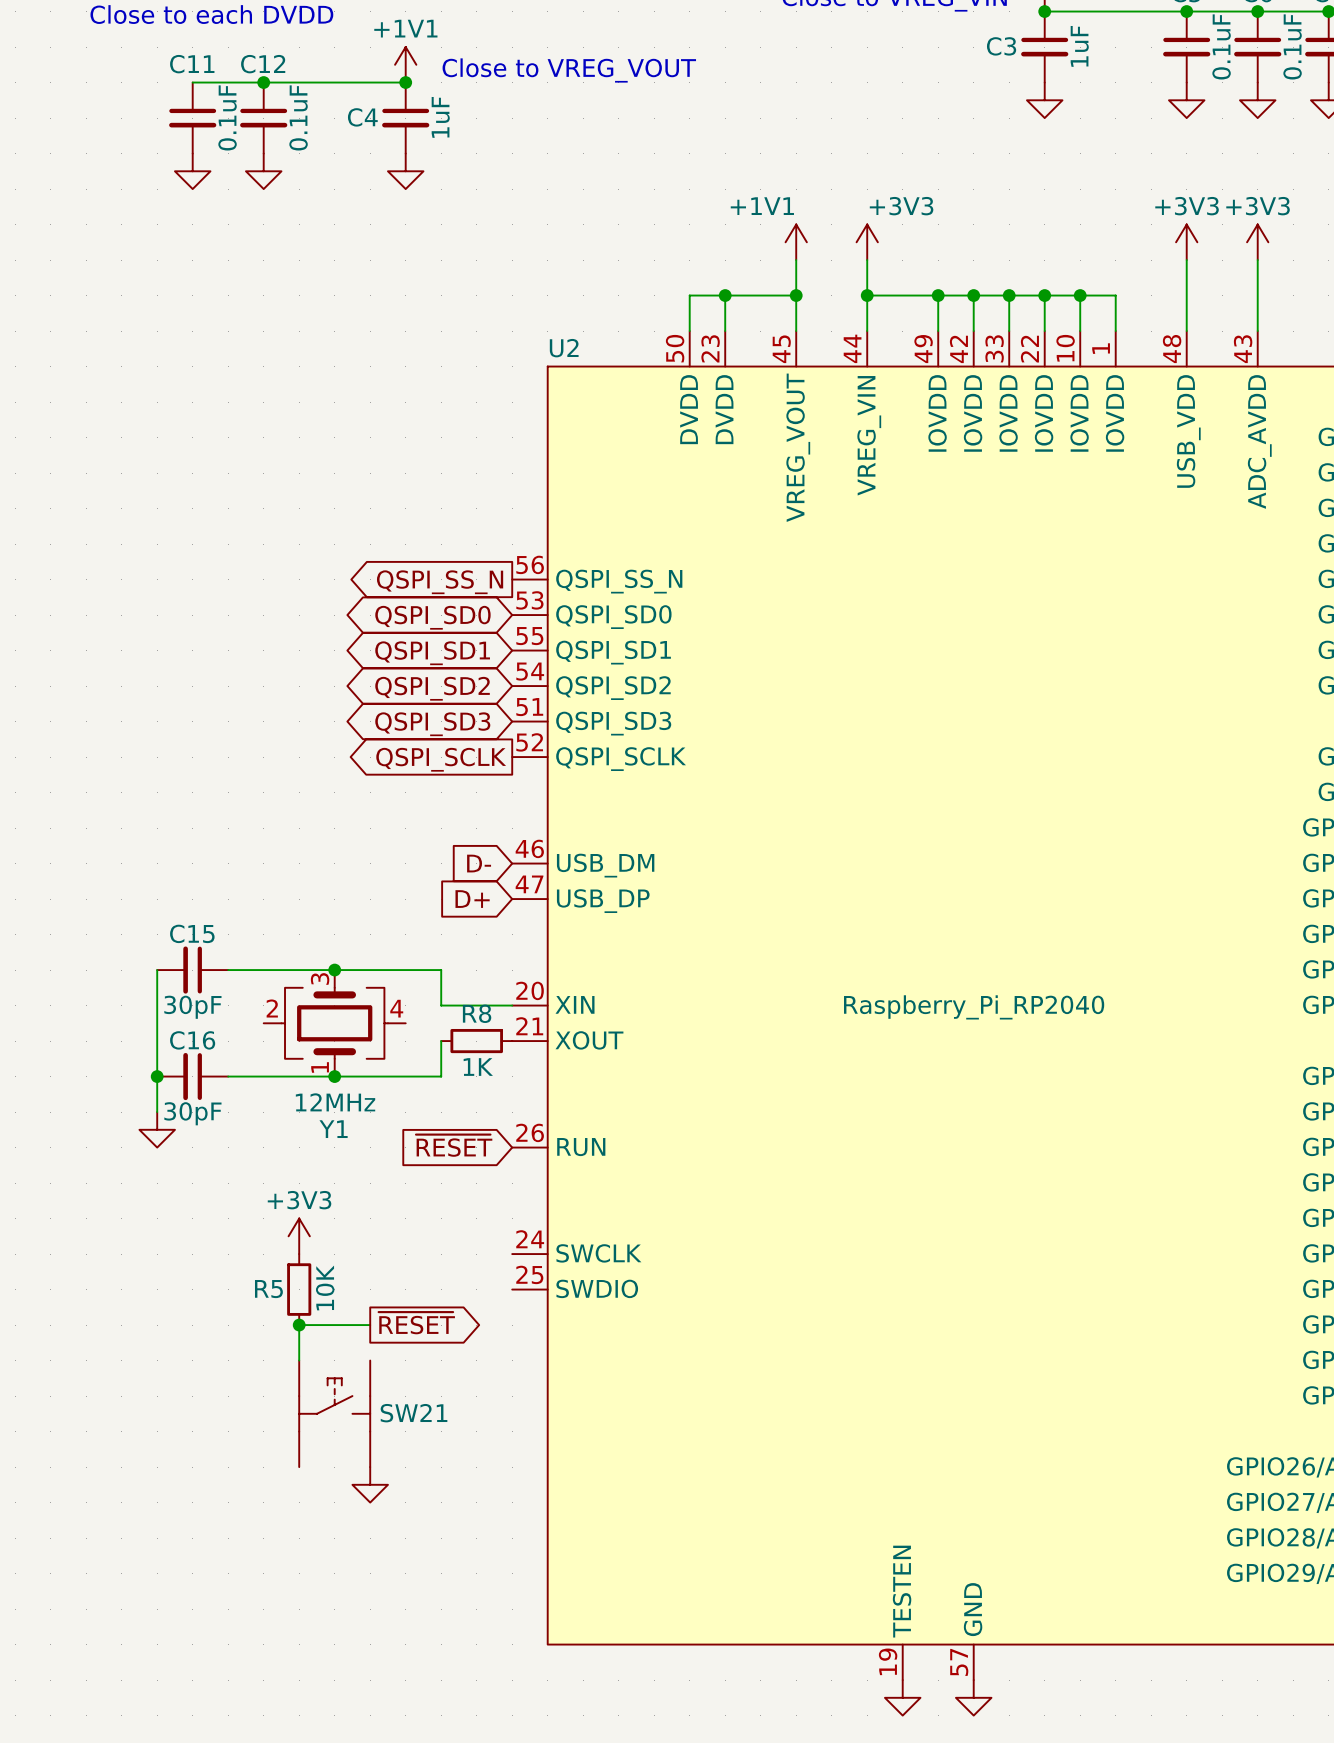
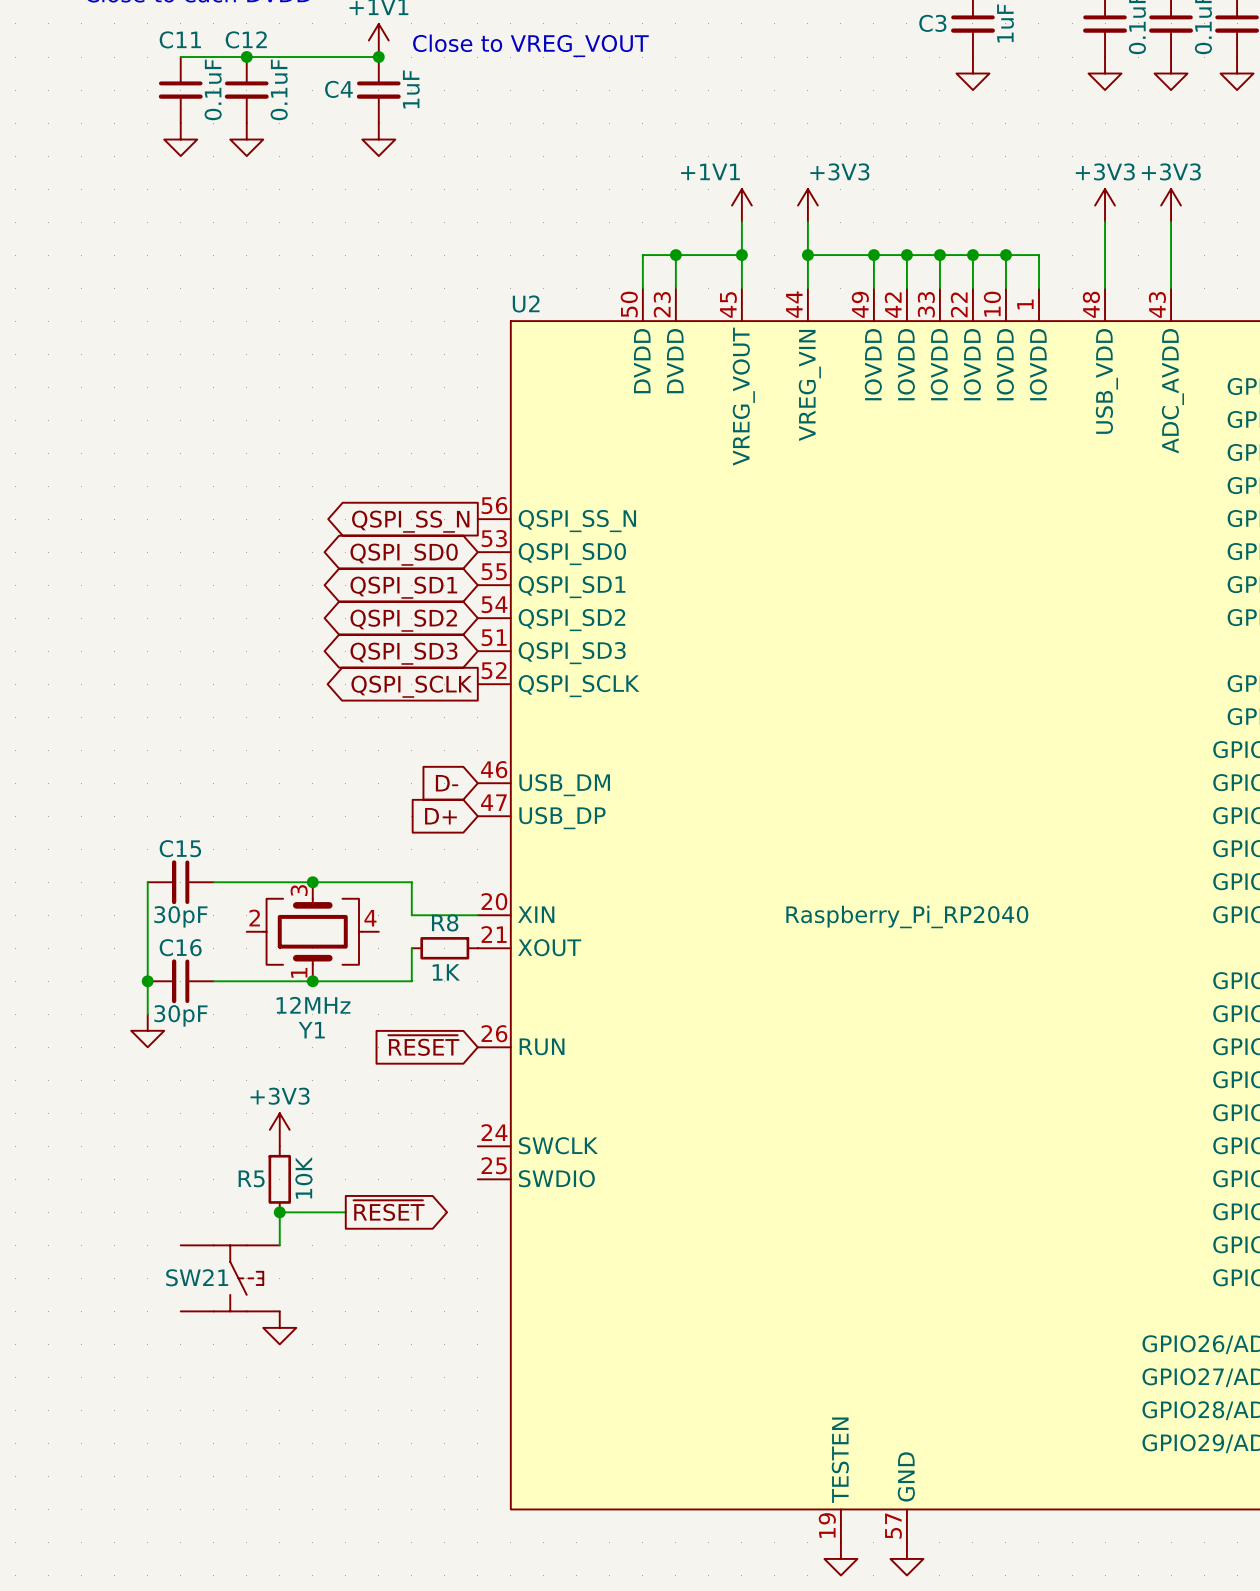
SW21 rotation: 0° (334, 1404) -> 90° clockwise (238, 1278)
SW21 position: (334, 1413) -> (230, 1278)
SW21 name position: SW21 (414, 1413) -> SW21 (197, 1277)
power symbol position: (370, 1484) -> (279, 1327)

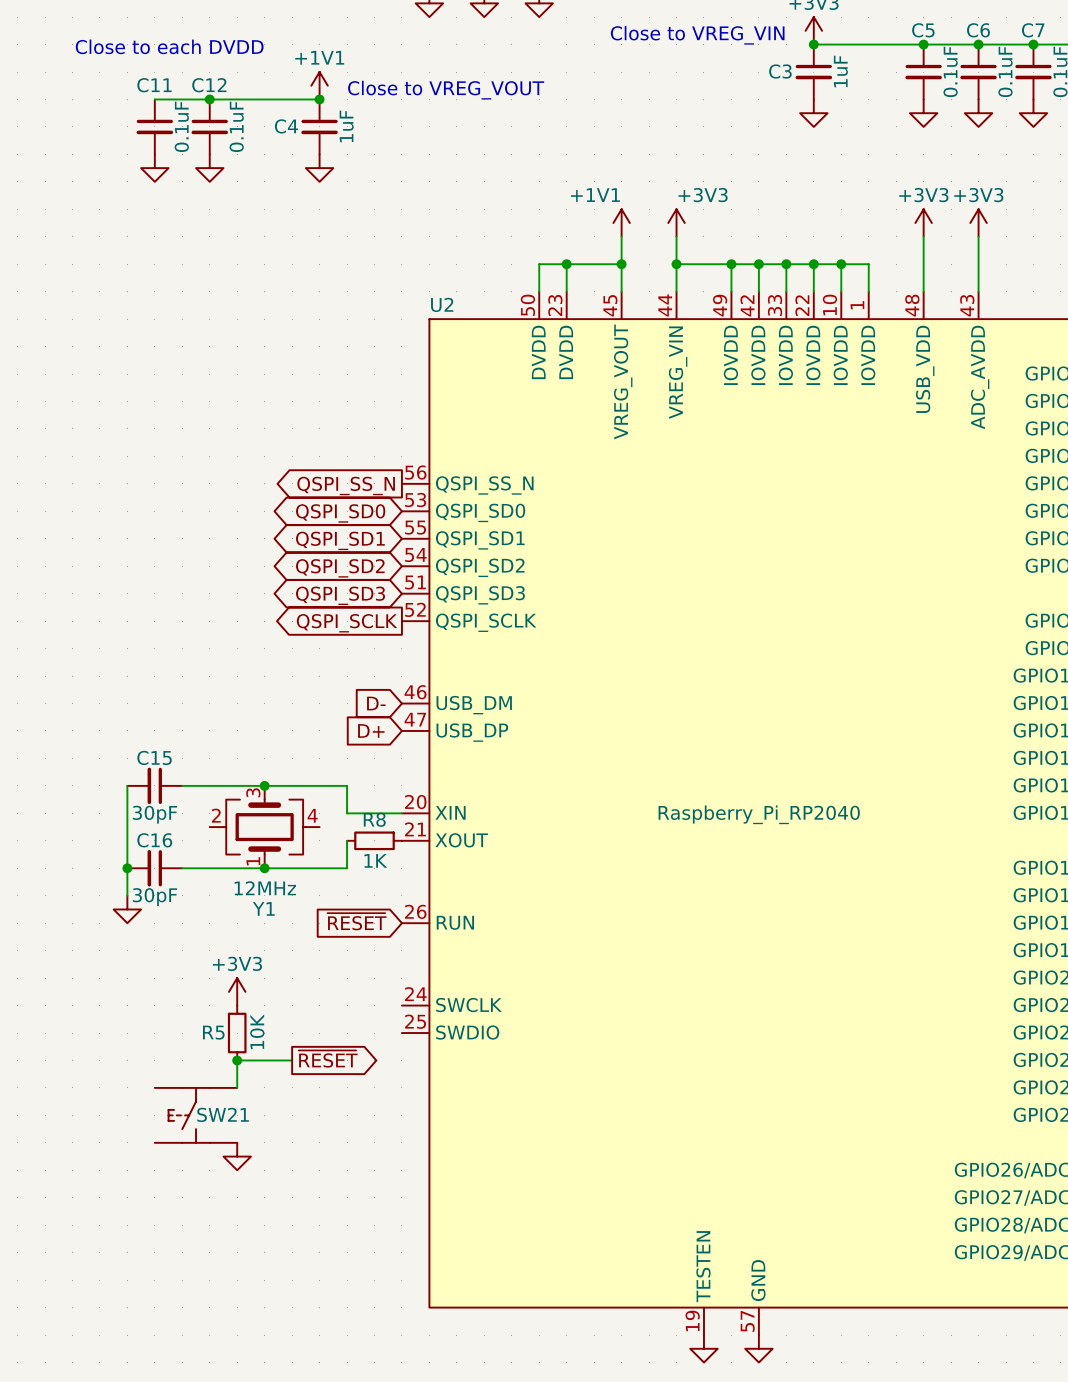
SW21 flip: as is (238, 1278) -> left-right (189, 1115)

